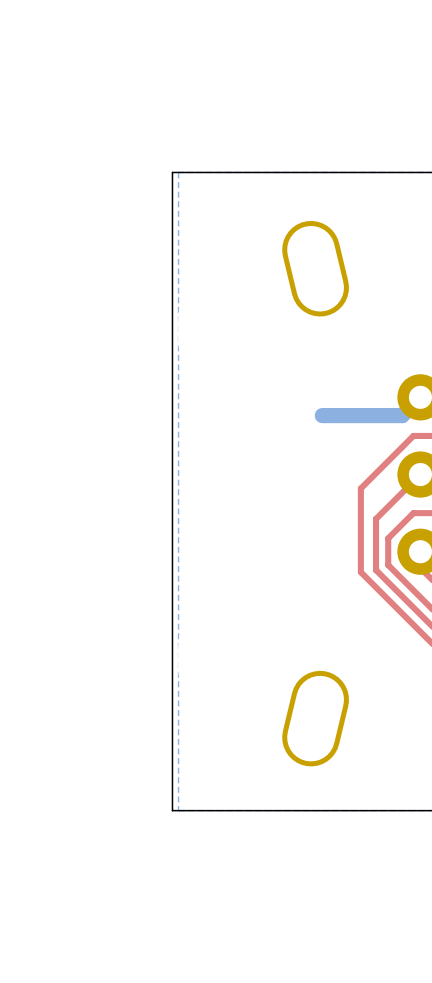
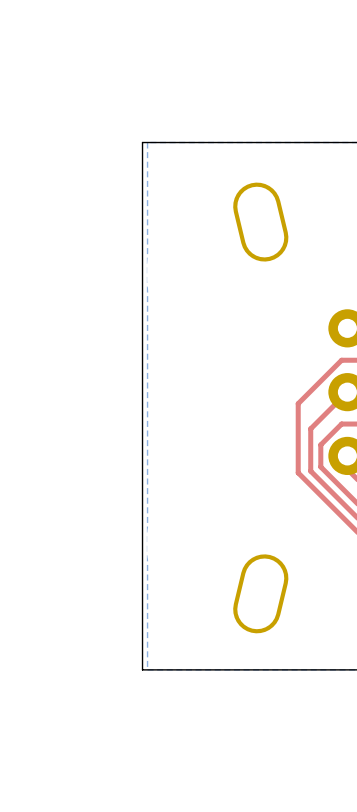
bottom track: (420, 397) (402, 415) (322, 415) -> none

